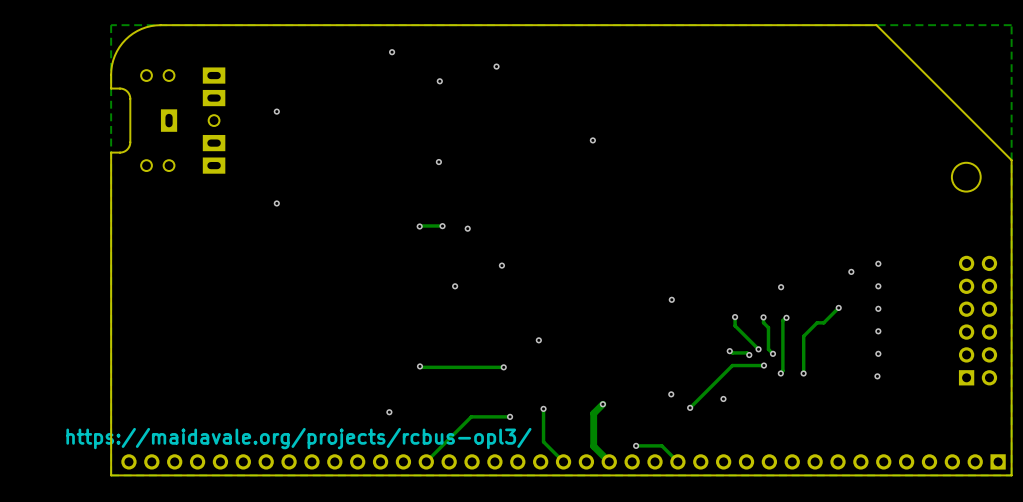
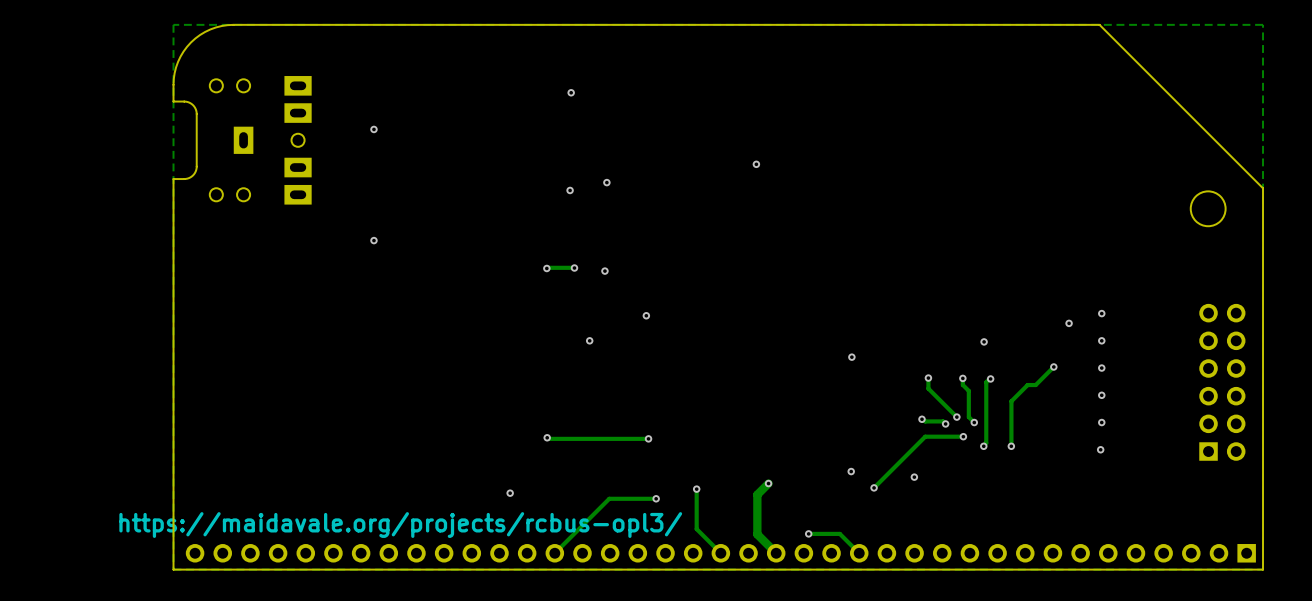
via: (392, 52) -> none
via: (496, 66) -> none
via: none -> (606, 182)
via: (538, 340) -> none

